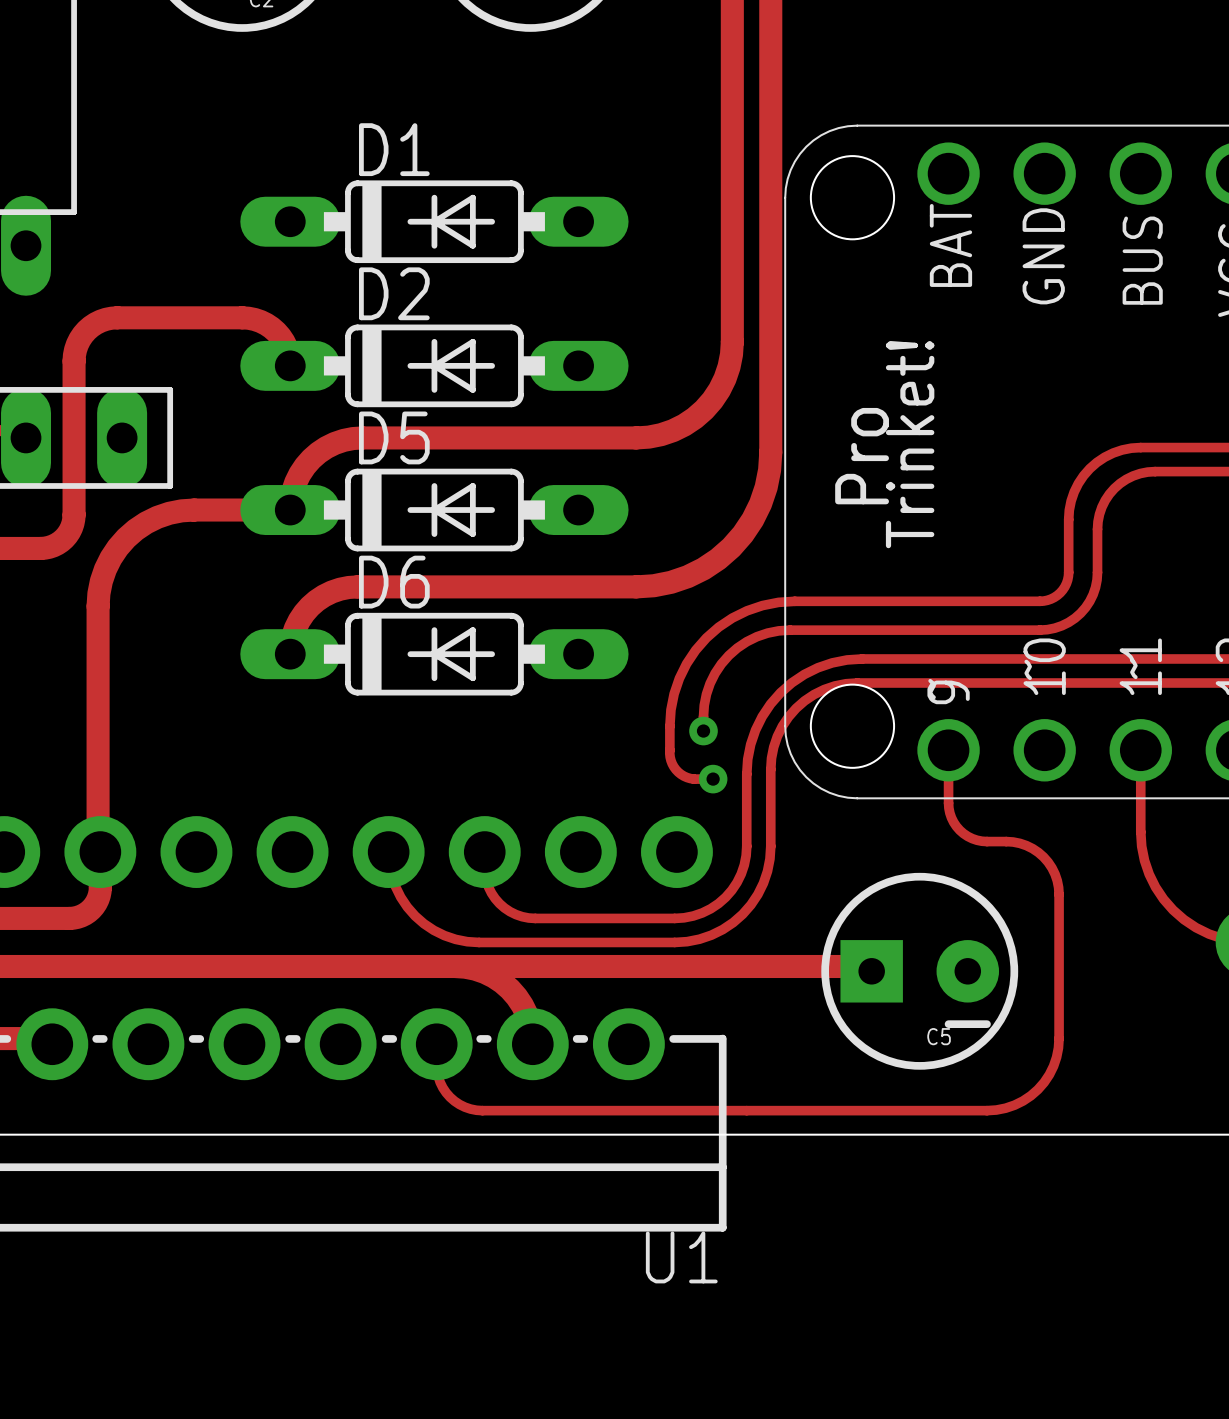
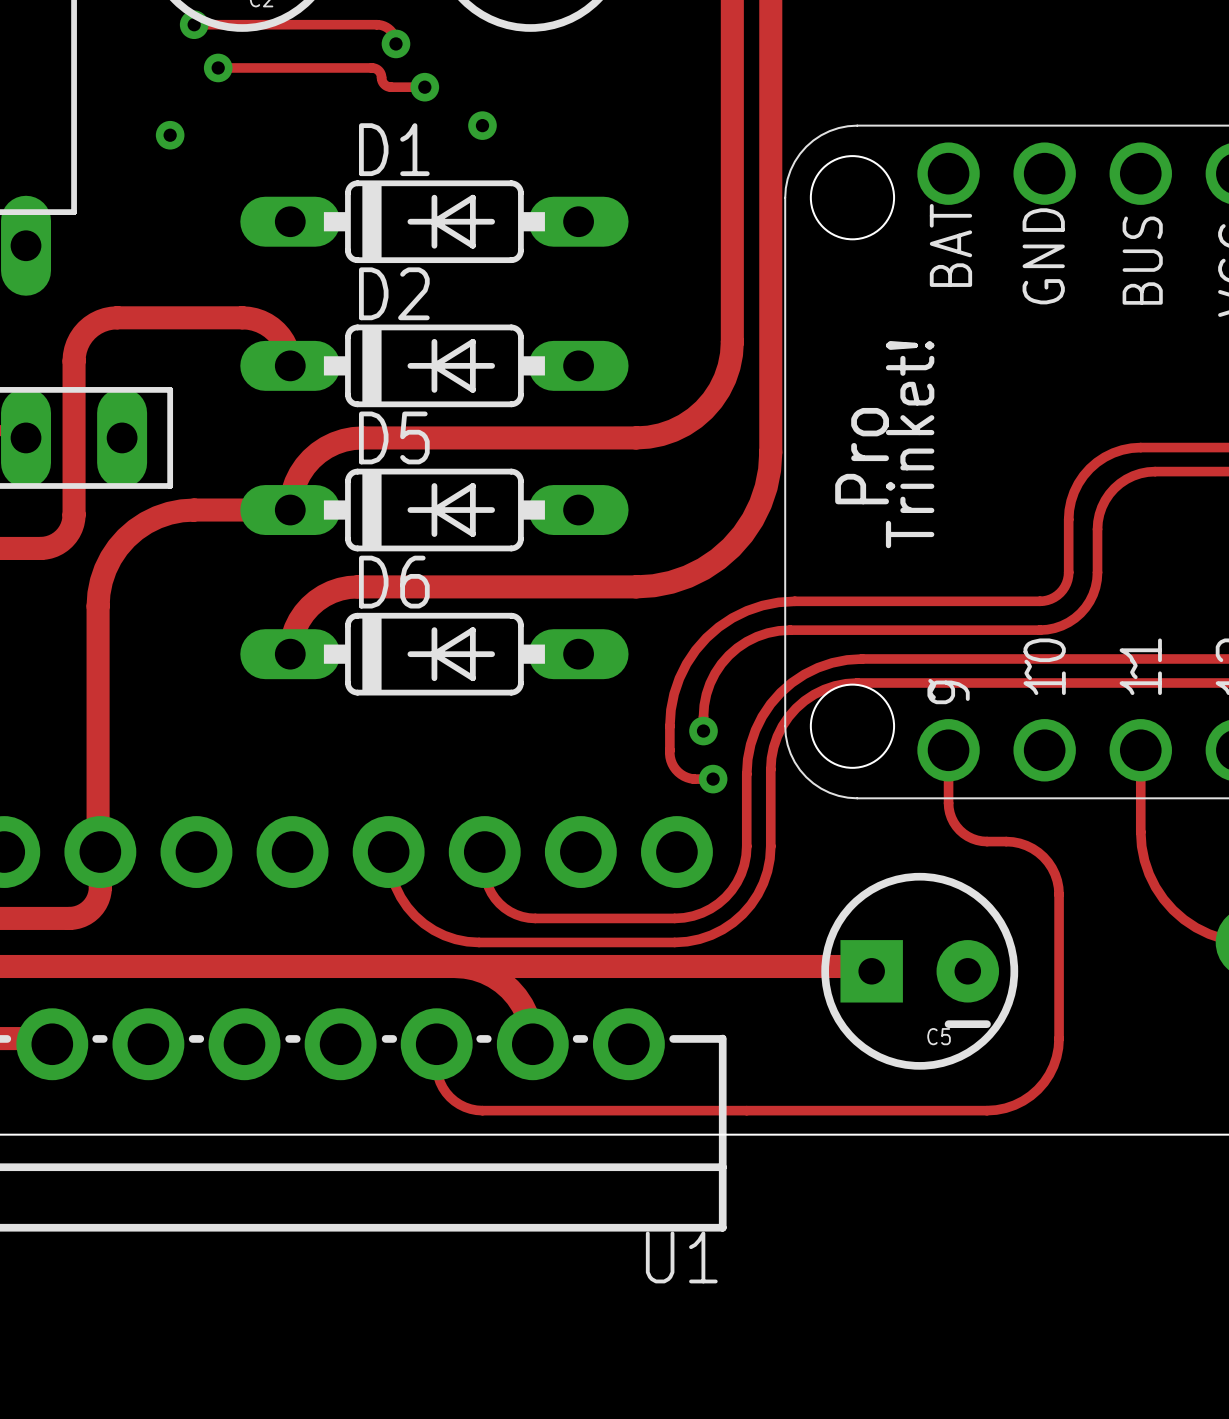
track: none -> (194, 24) (379, 24) (390, 30) (395, 43)
via: none -> (194, 24)
via: none -> (395, 43)
track: none -> (218, 67) (373, 68) (379, 71) (382, 82) (387, 86) (424, 87)
via: none -> (218, 67)
via: none -> (424, 87)
via: none -> (482, 125)
via: none -> (170, 135)

